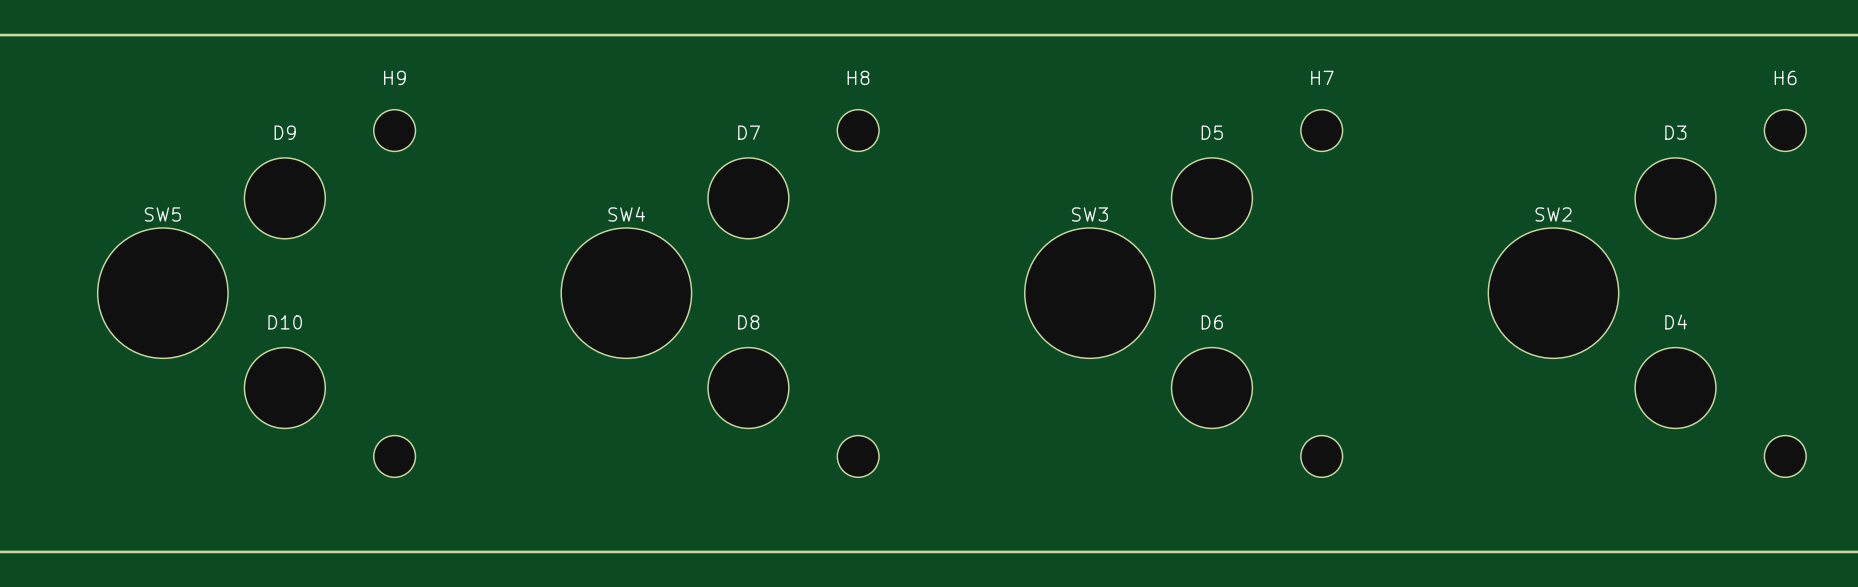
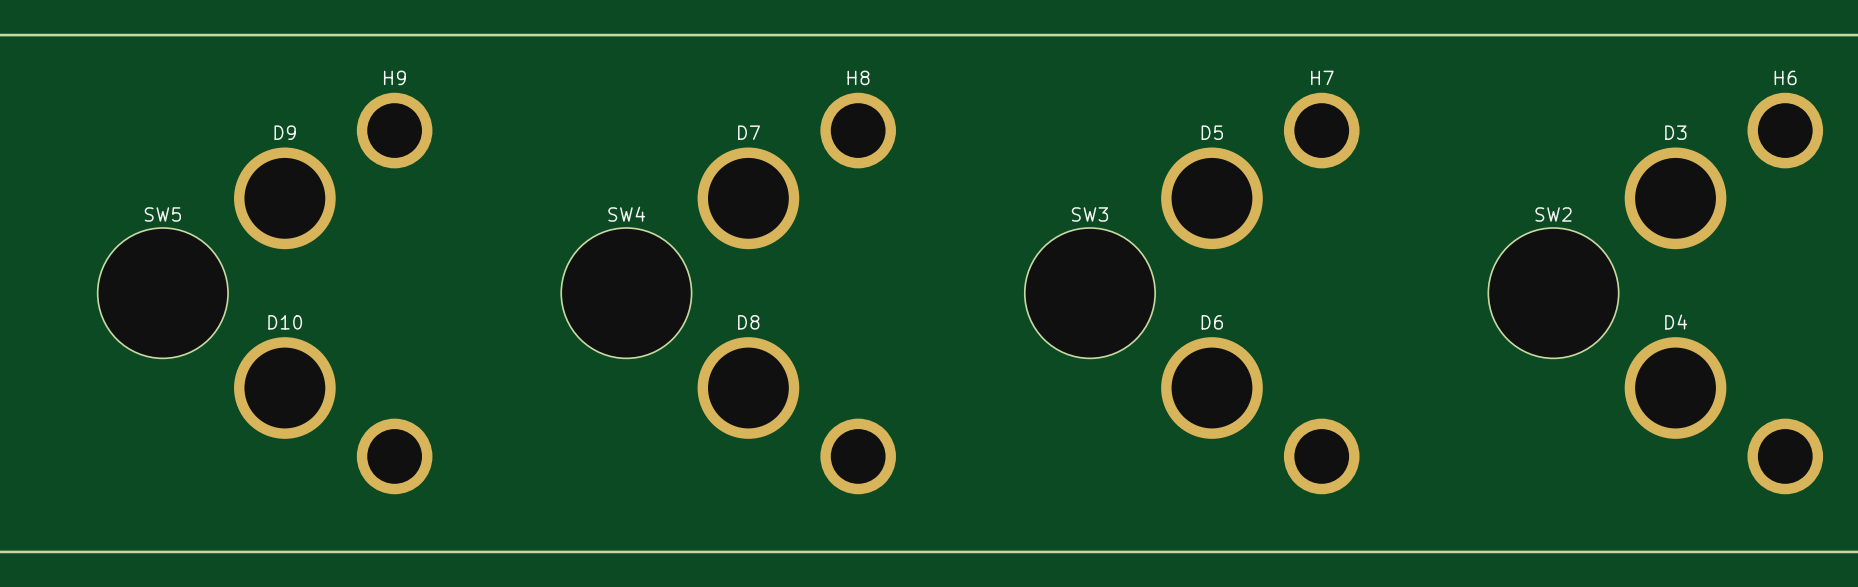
H9 footprint: [373, 109, 416, 478] -> [356, 92, 433, 495]
H8 footprint: [837, 109, 880, 478] -> [820, 92, 896, 495]
H7 footprint: [1300, 109, 1343, 478] -> [1283, 92, 1360, 495]
H6 footprint: [1764, 109, 1807, 478] -> [1747, 92, 1824, 495]
D9 footprint: [244, 157, 326, 239] -> [234, 147, 336, 250]
D7 footprint: [708, 157, 789, 239] -> [697, 147, 800, 250]
D5 footprint: [1171, 157, 1253, 239] -> [1161, 147, 1263, 250]
D3 footprint: [1635, 157, 1716, 239] -> [1624, 147, 1727, 250]
D10 footprint: [244, 347, 326, 429] -> [234, 337, 336, 439]
D8 footprint: [708, 347, 789, 429] -> [697, 337, 800, 439]
D6 footprint: [1171, 347, 1253, 429] -> [1161, 337, 1263, 439]
D4 footprint: [1635, 347, 1716, 429] -> [1624, 337, 1727, 439]

